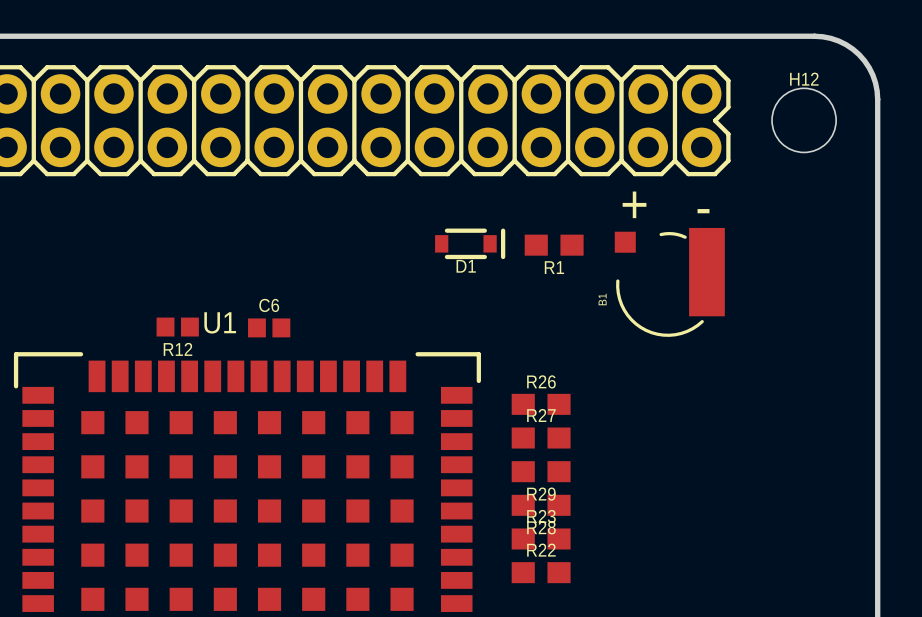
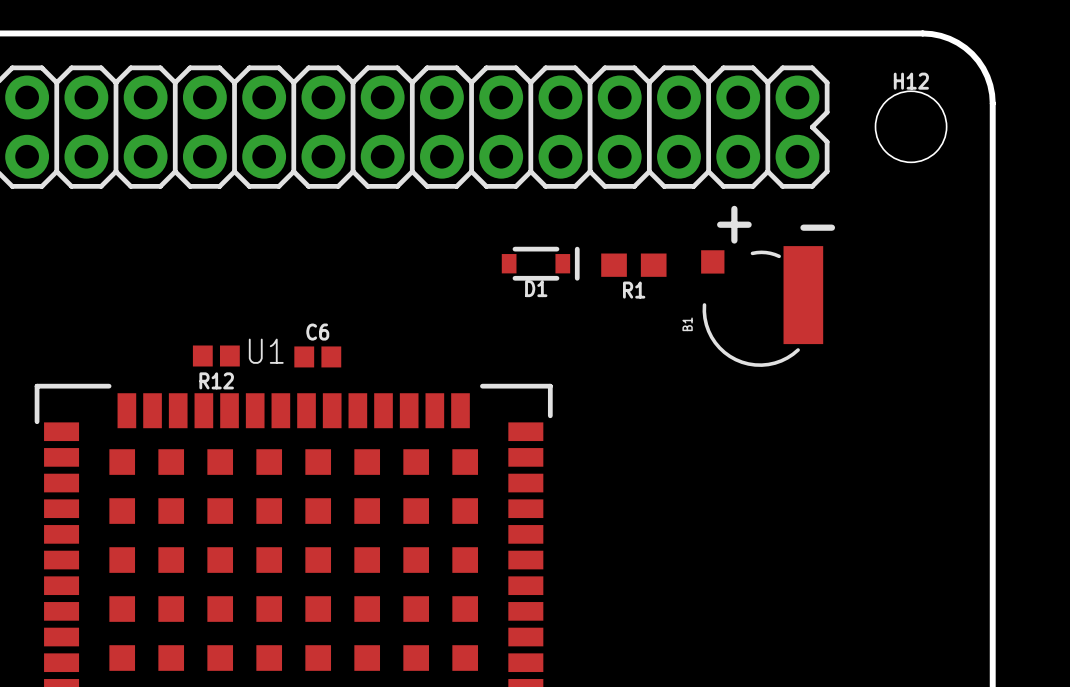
R26: (541, 404) -> none
R27: (541, 438) -> none
R29: (541, 471) -> none
R28: (541, 505) -> none
R23: (541, 538) -> none
R22: (541, 572) -> none

